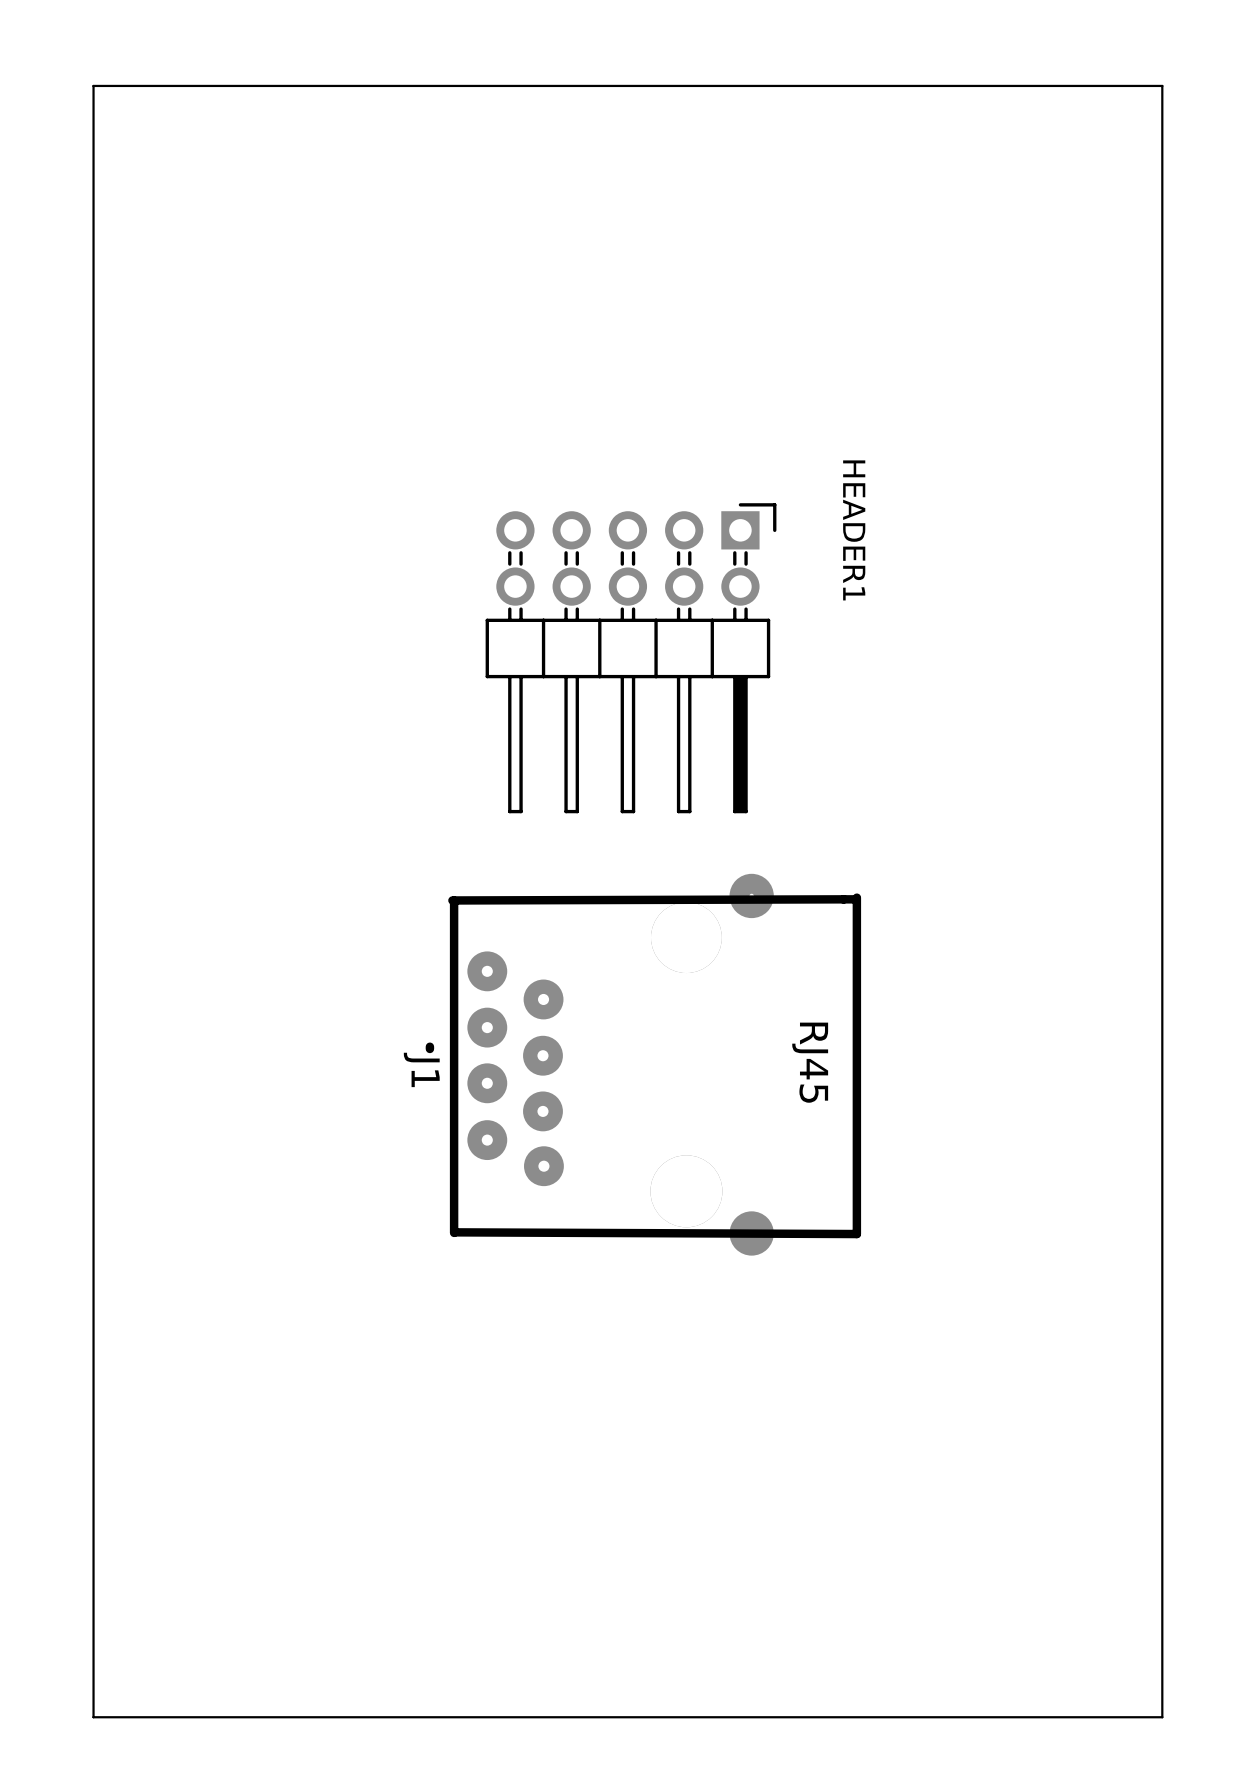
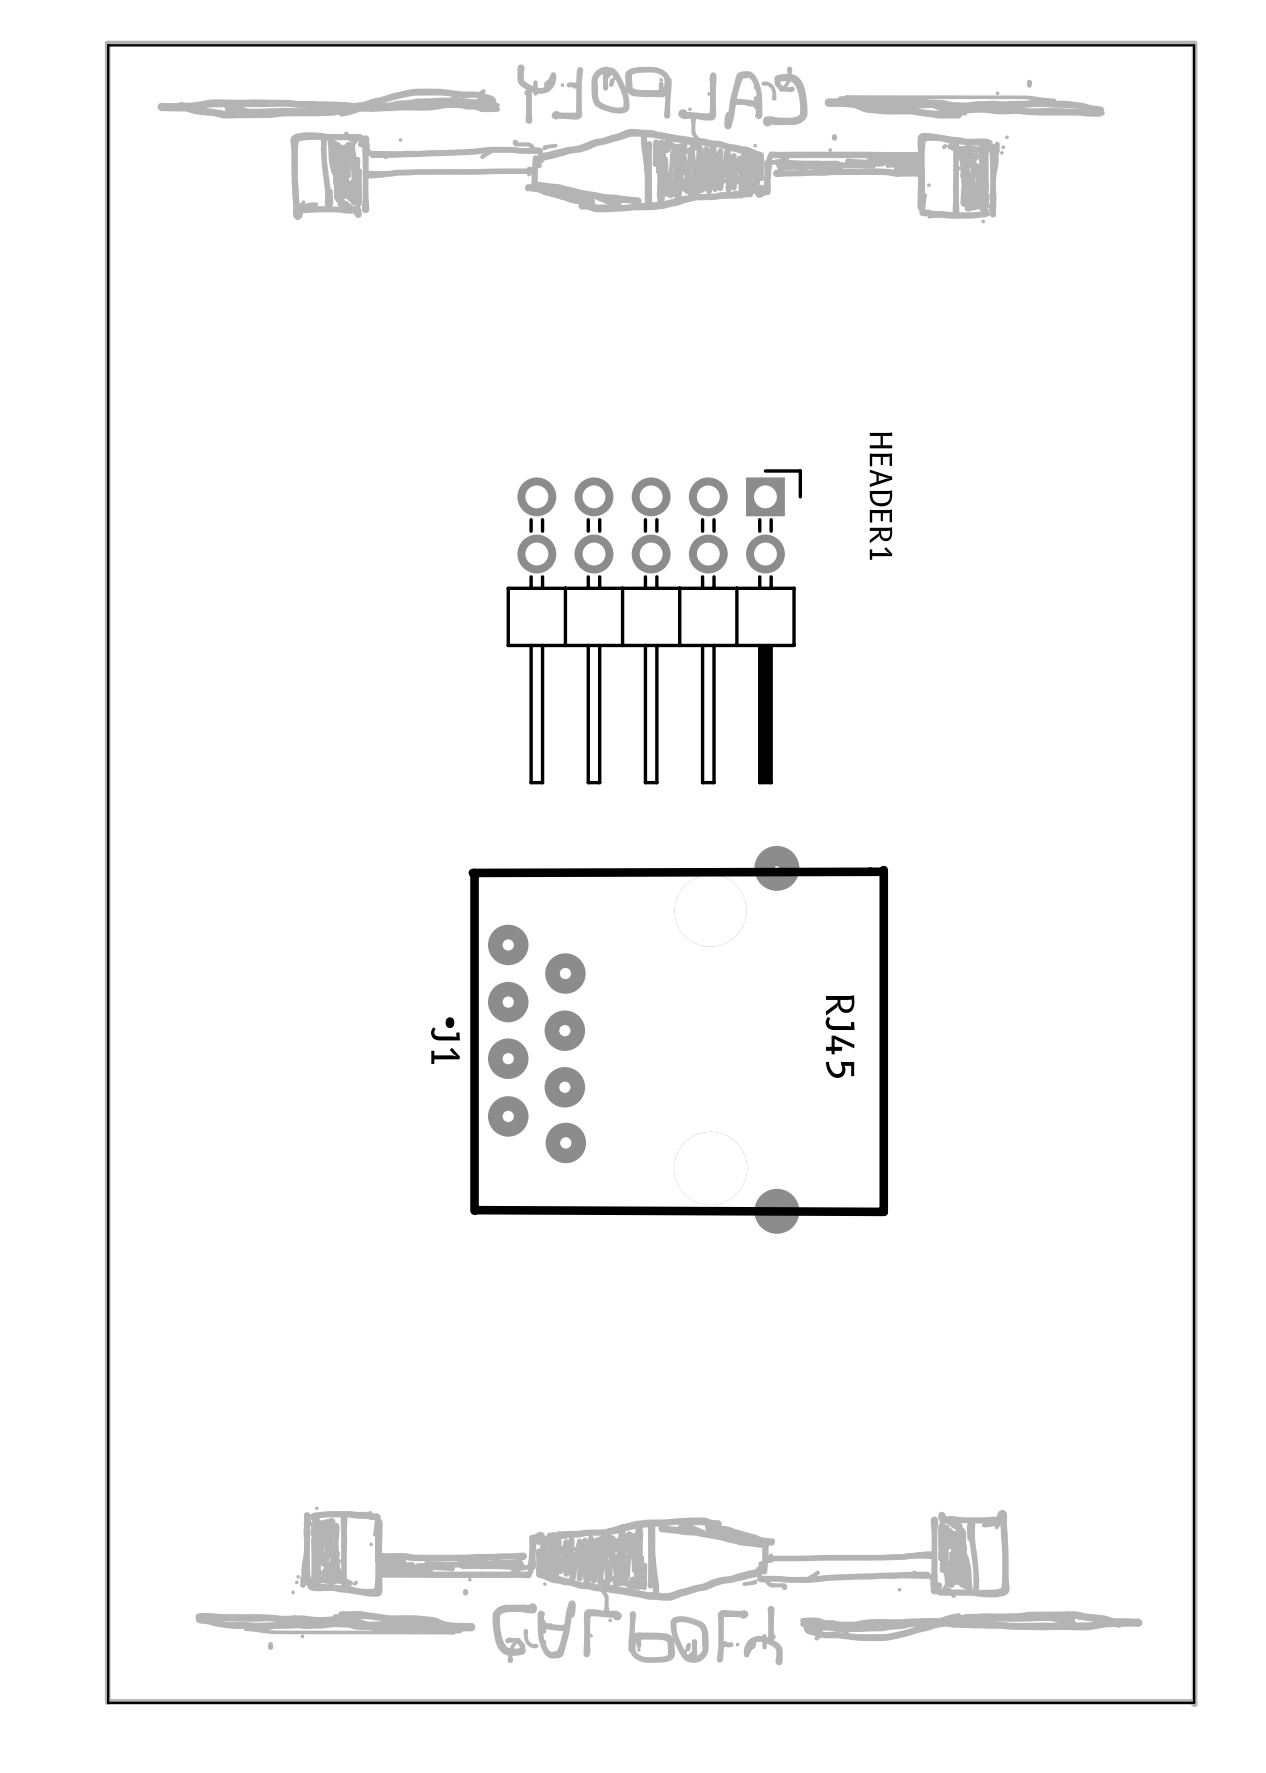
track: none -> (1194, 43) (107, 43) (107, 1701) (1192, 1701) (1194, 1704) (1194, 43)
drawing: none -> [157, 64, 1105, 224]
drawing: none -> [195, 1506, 1143, 1666]

